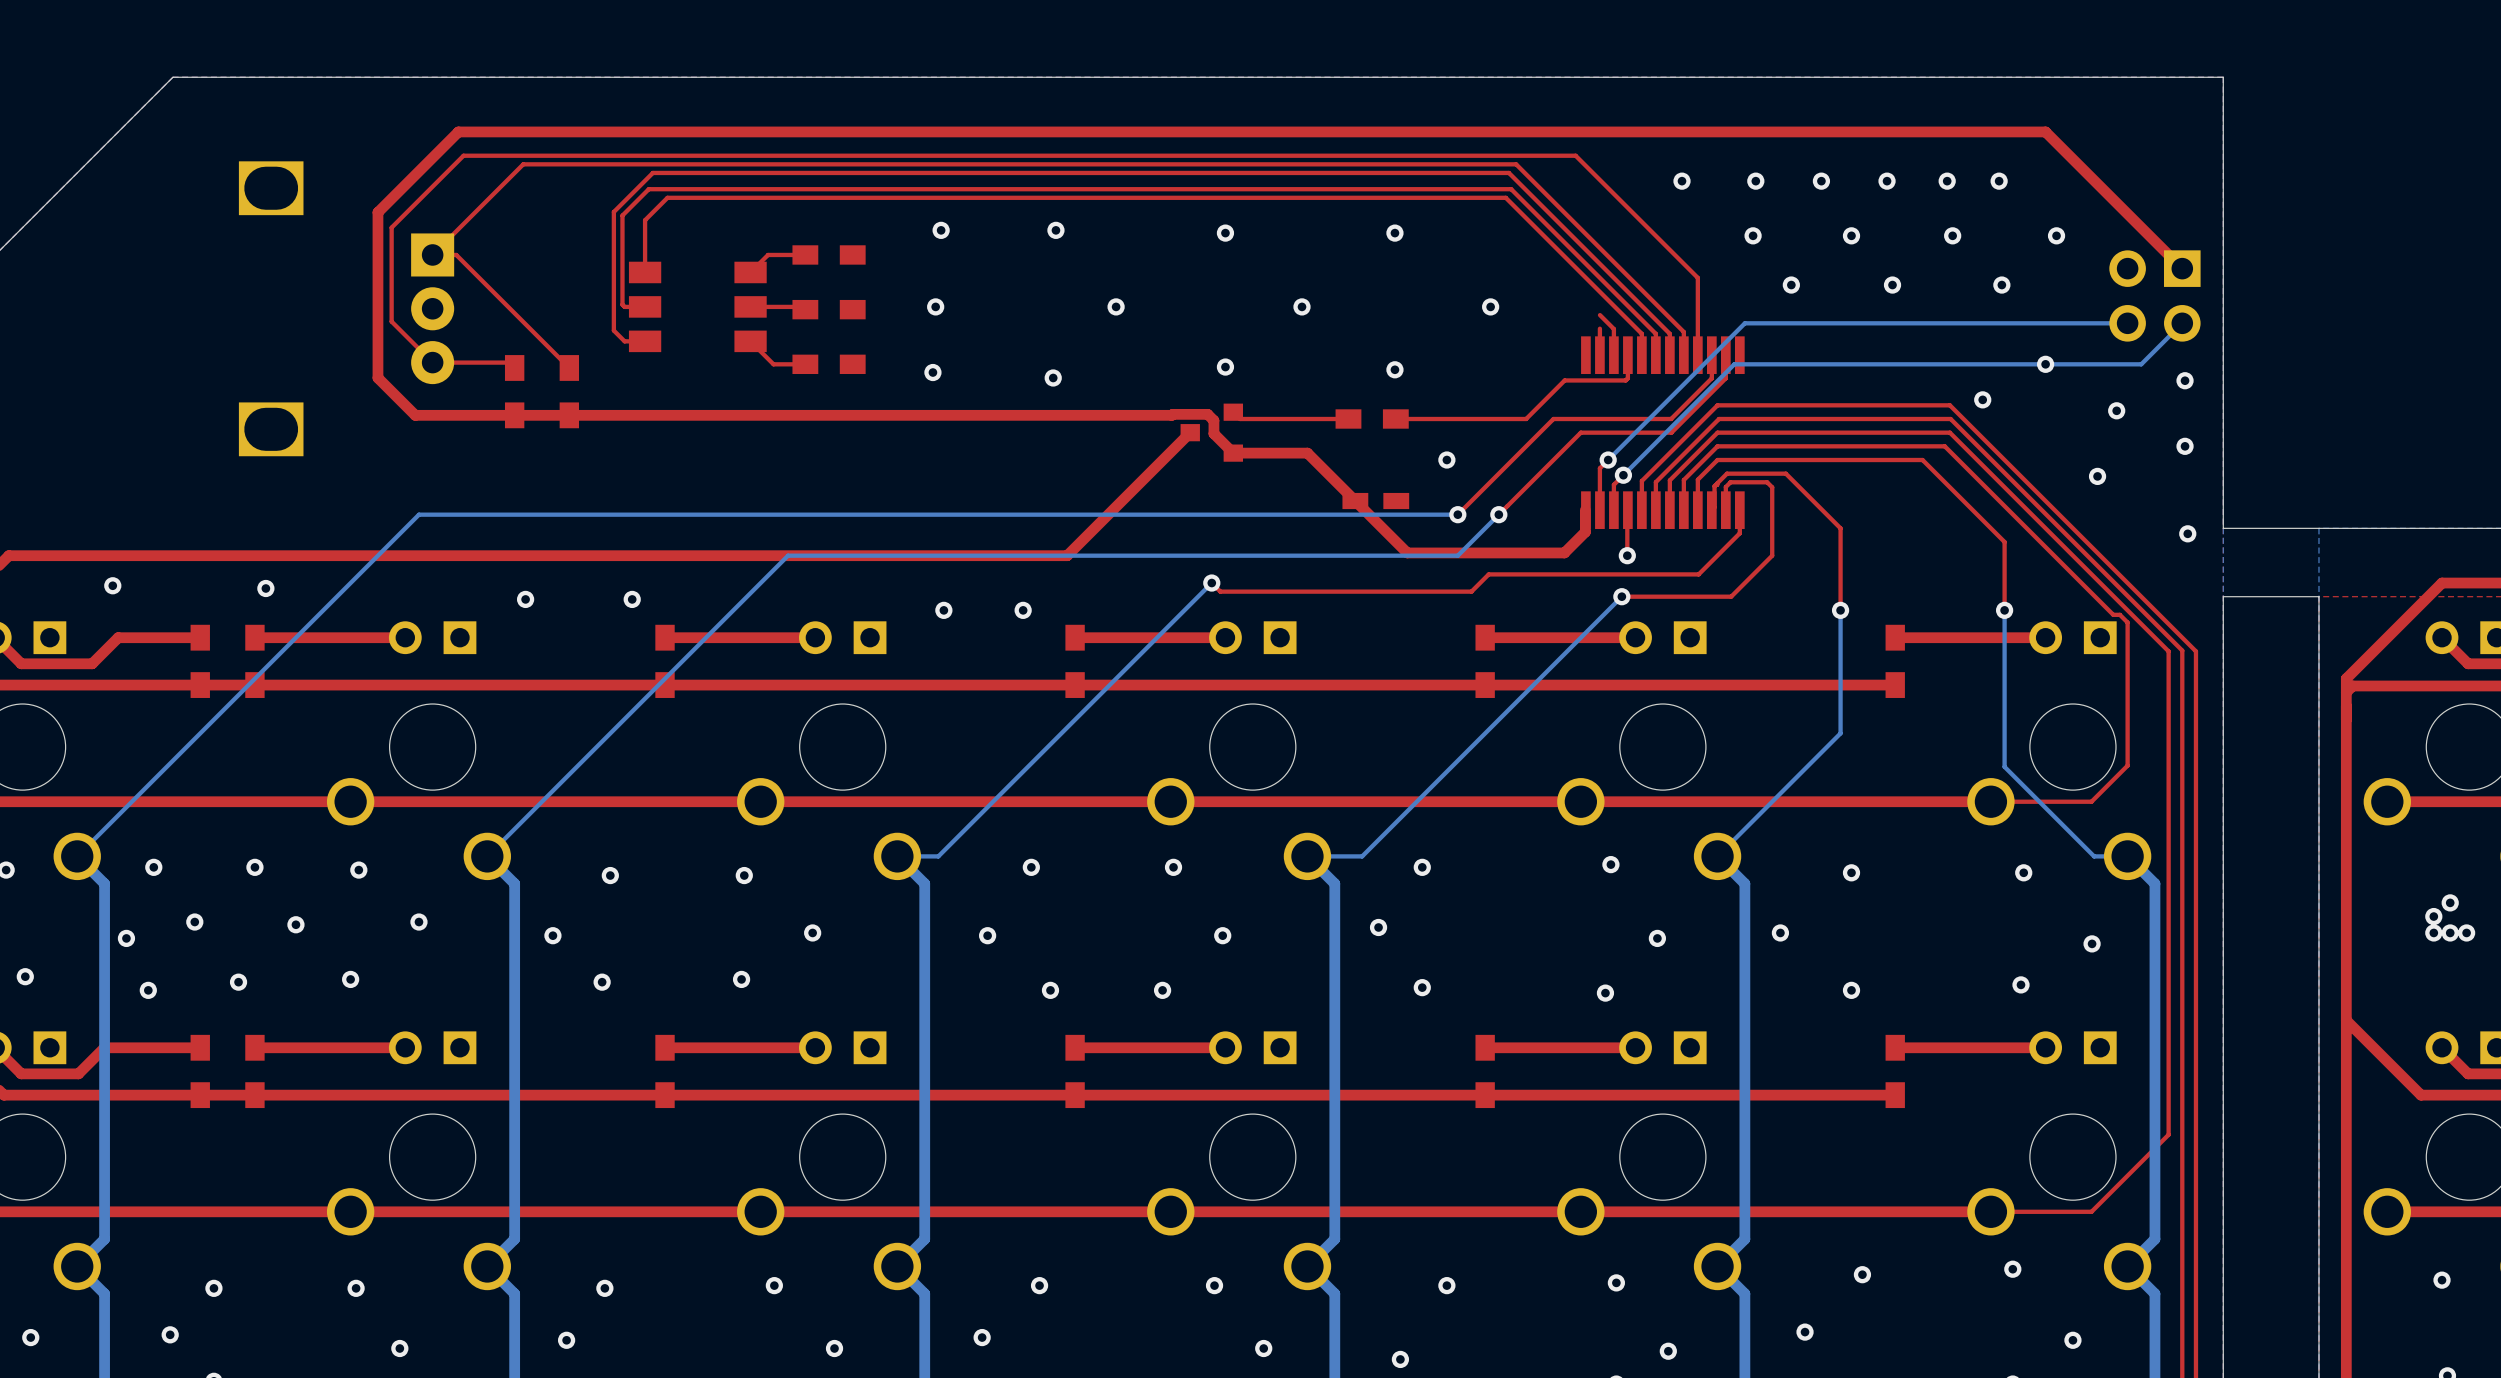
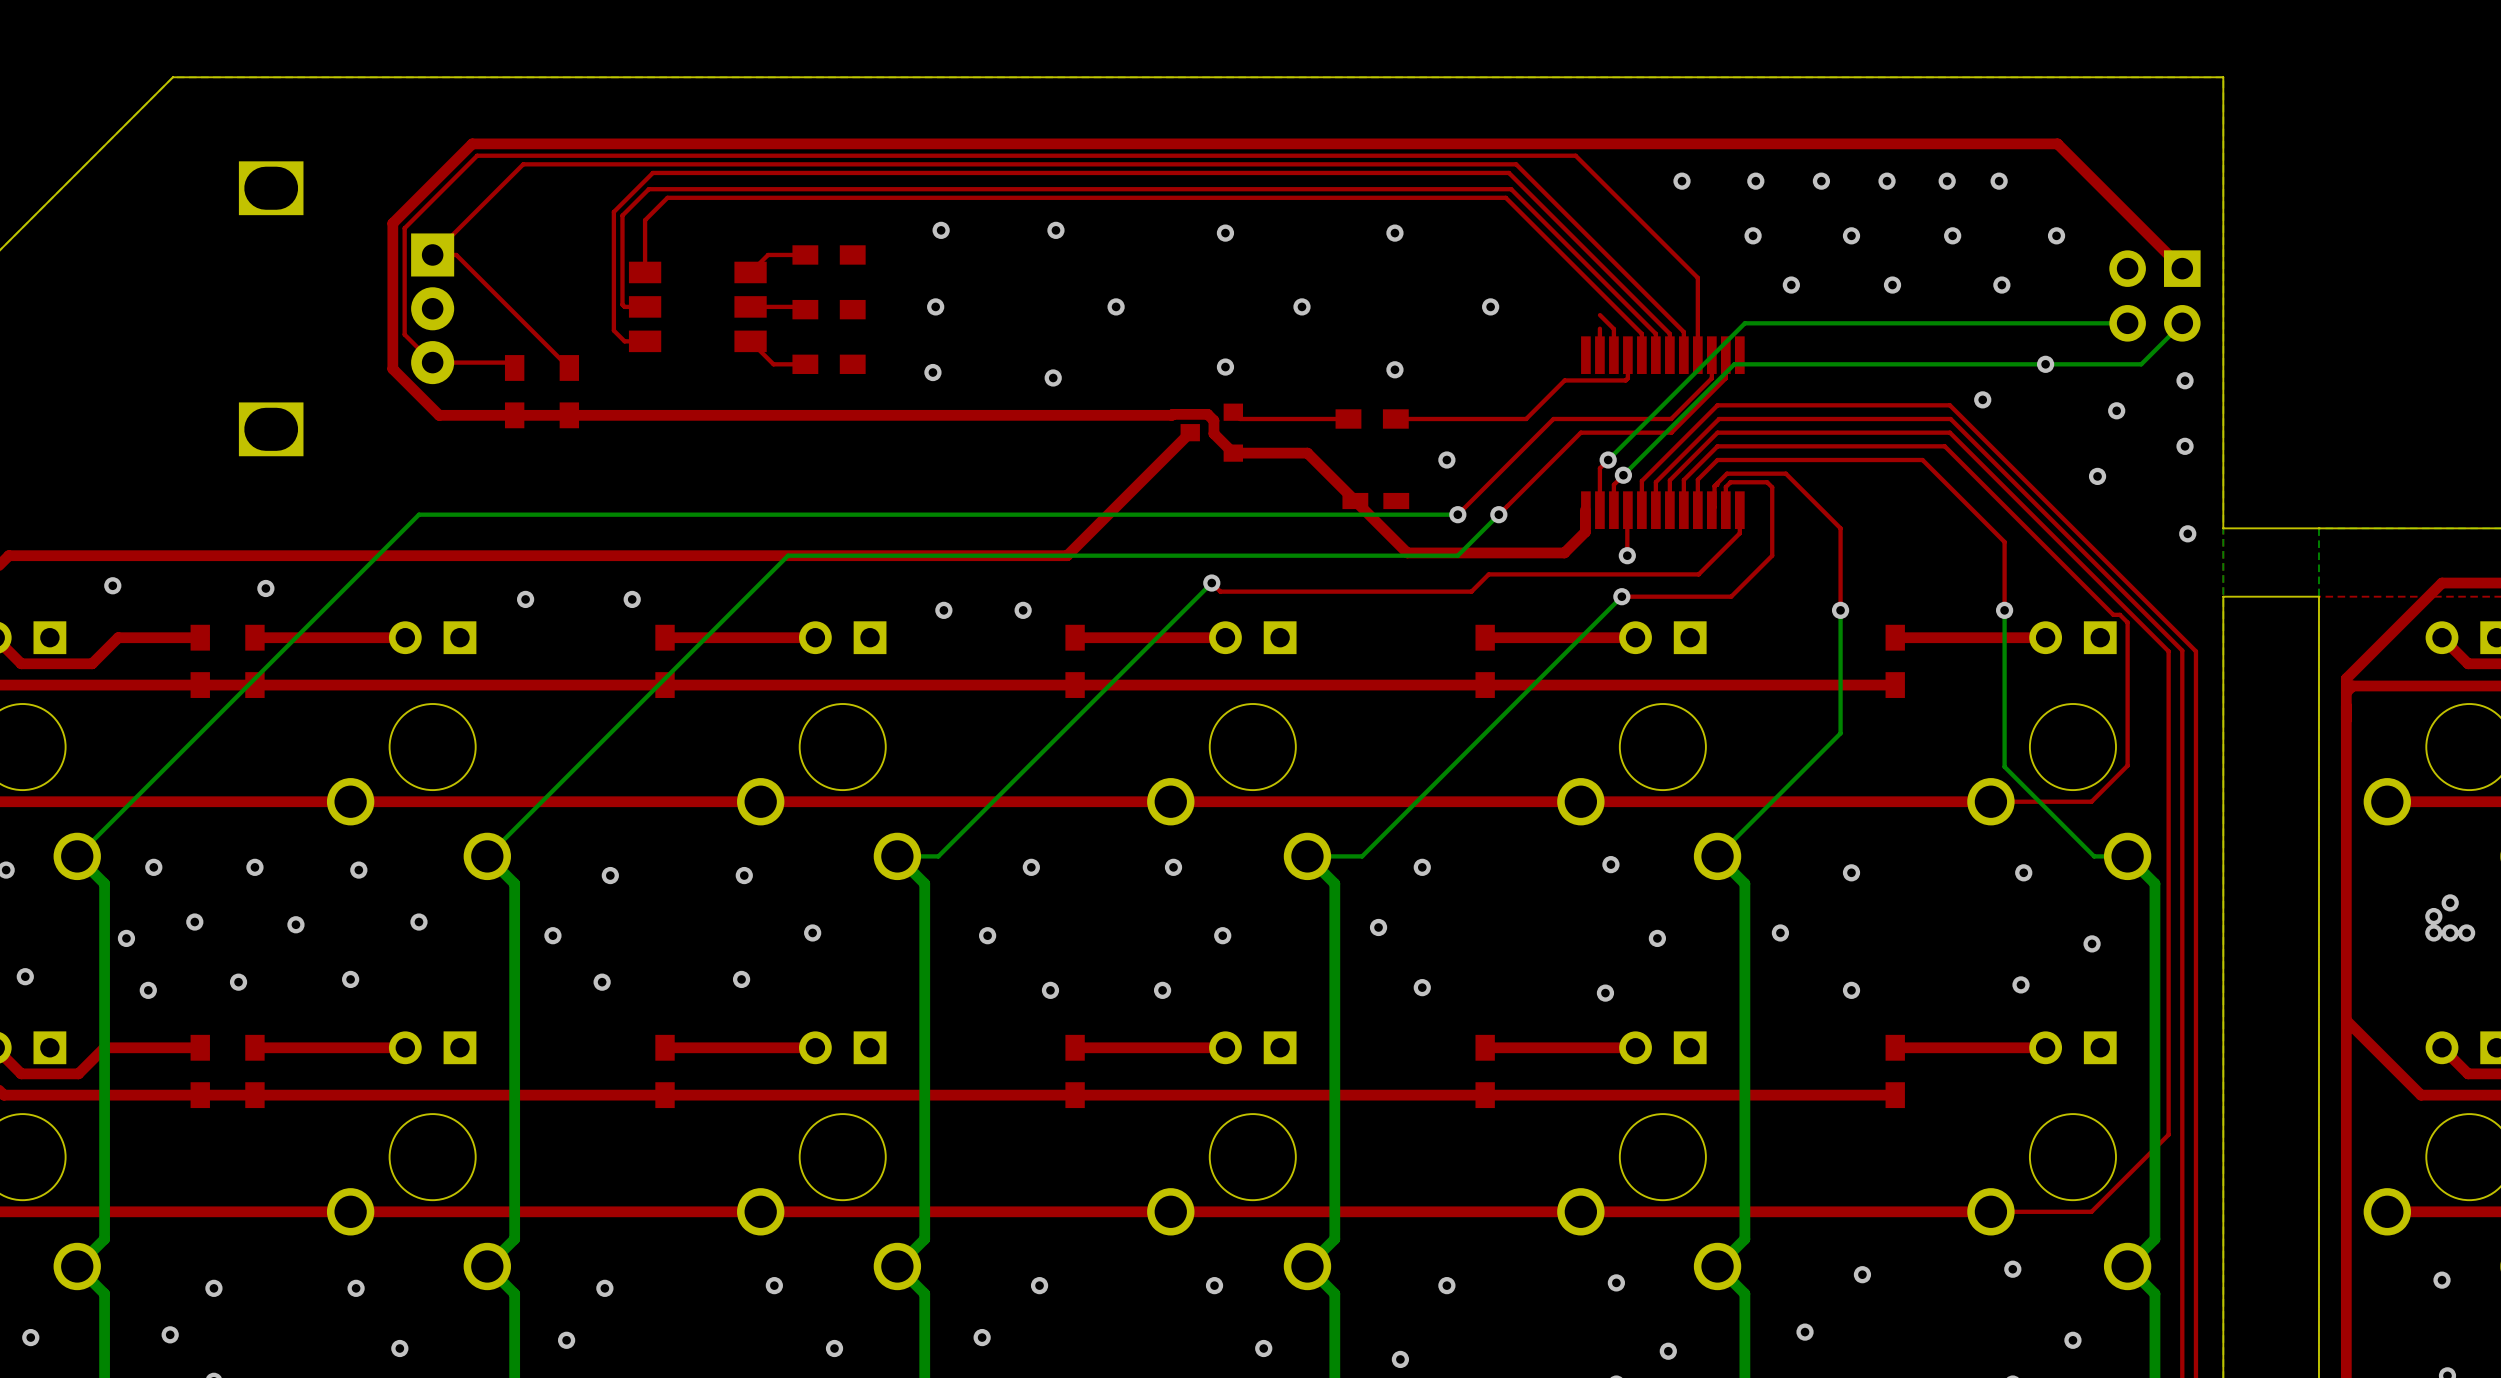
top track: (2057, 143) (2045, 131) (458, 131) (377, 212) (377, 377) (415, 415) (439, 415) -> (2057, 143) (472, 143) (392, 223) (392, 368) (439, 415)
top track: (477, 155) (463, 155) (391, 227) (391, 321) (404, 334) -> (477, 155) (404, 228) (404, 334)

